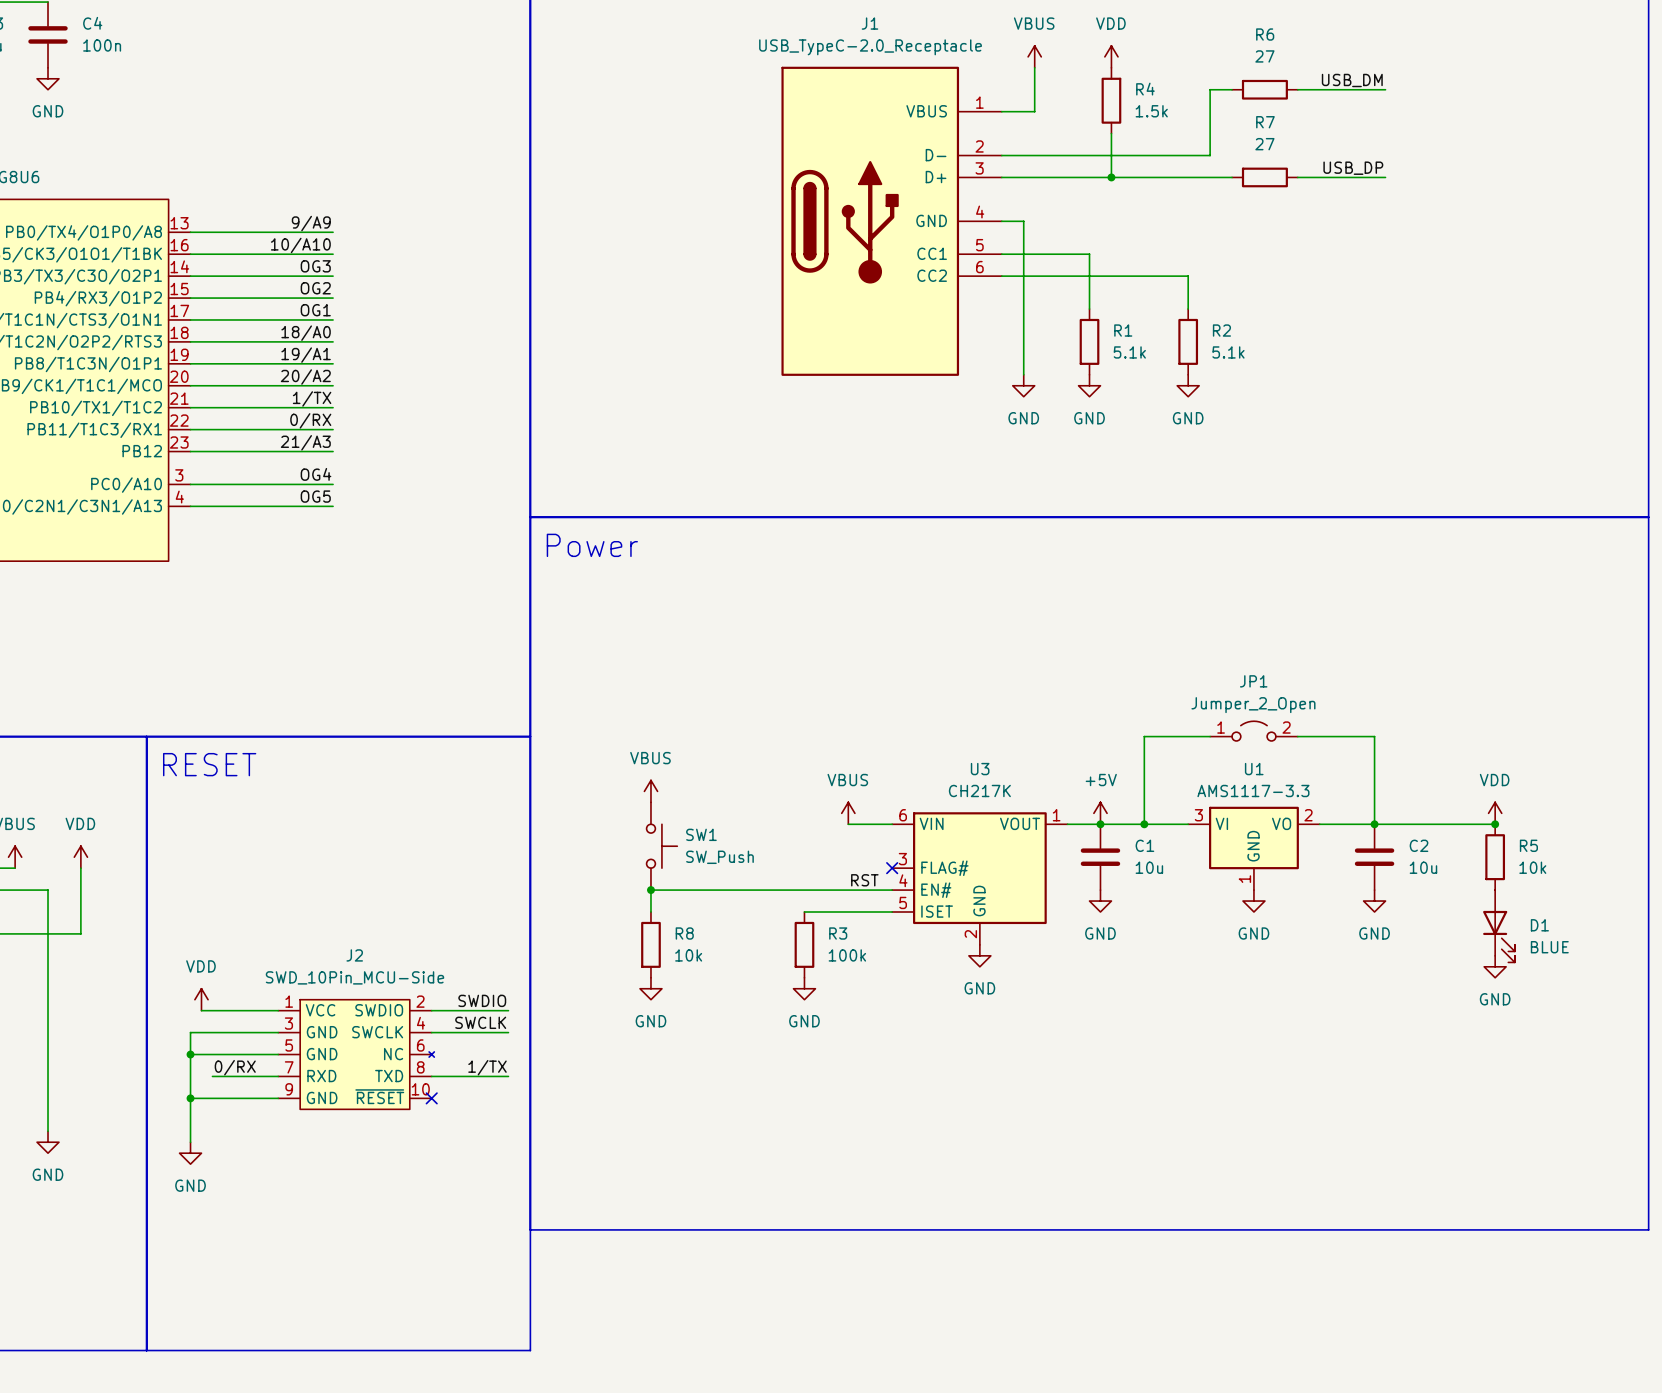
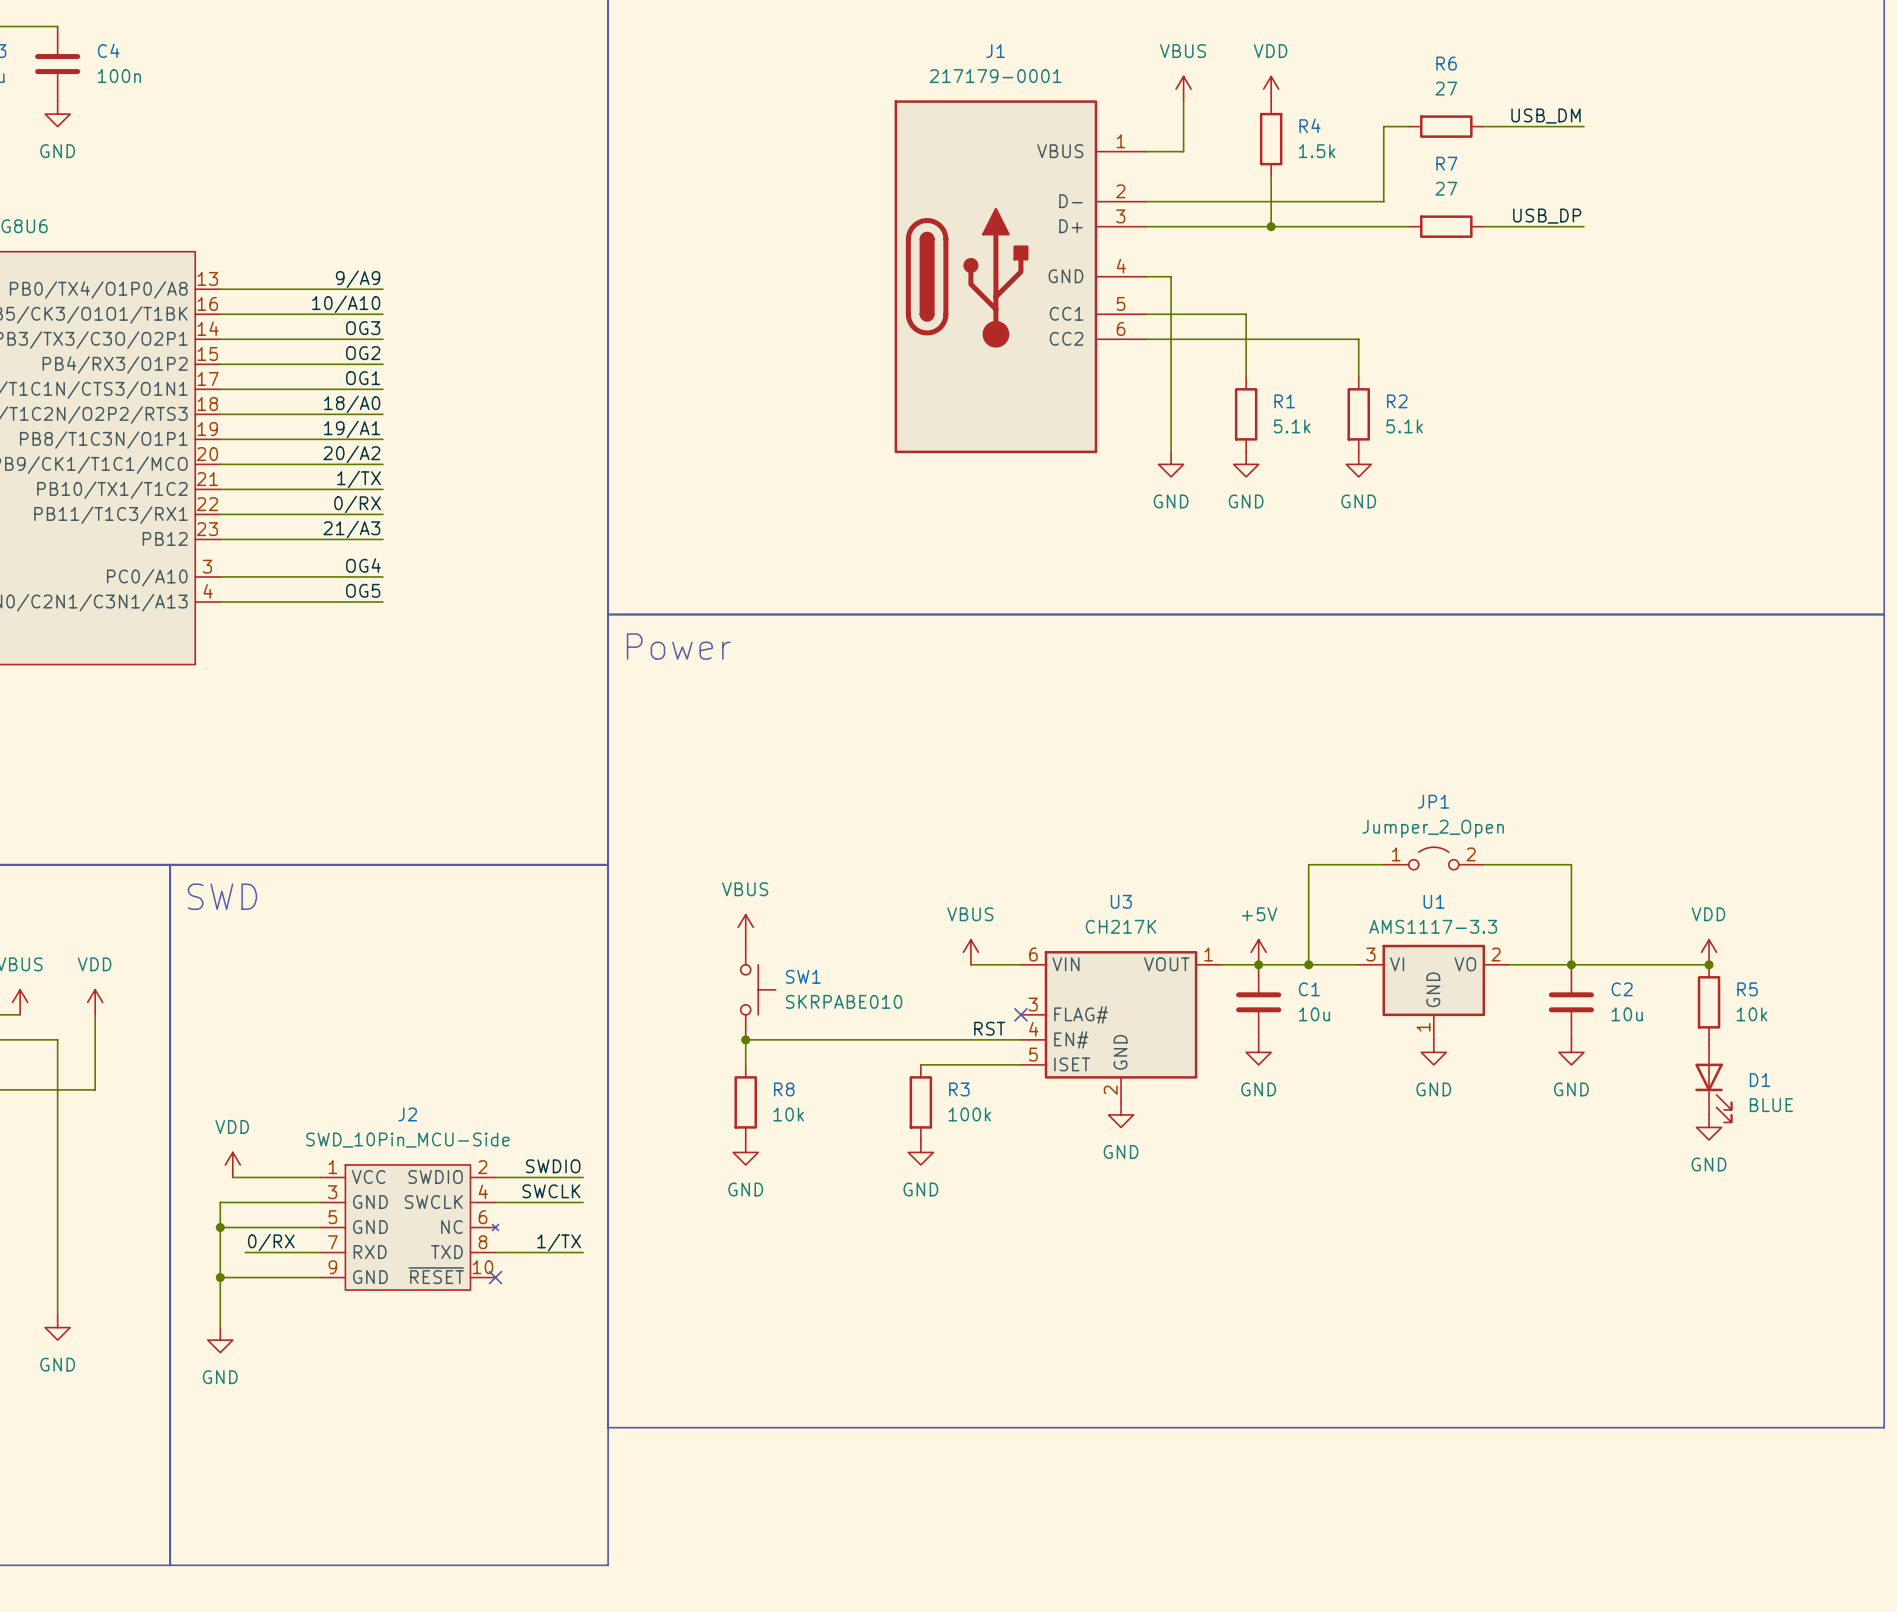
J1 value: USB_TypeC-2.0_Receptacle (870, 47) -> 217179-0001 (995, 76)
text: RESET (209, 764) -> SWD (222, 896)
SW1 value: SW_Push (719, 857) -> SKRPABE010 (844, 1001)

